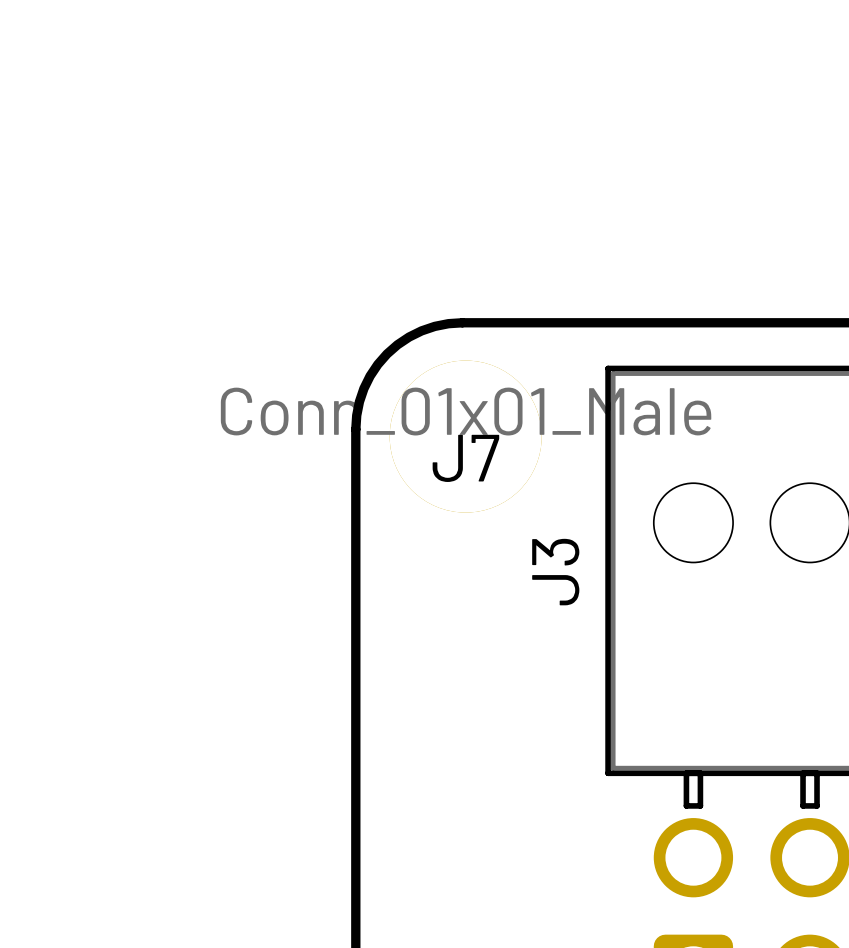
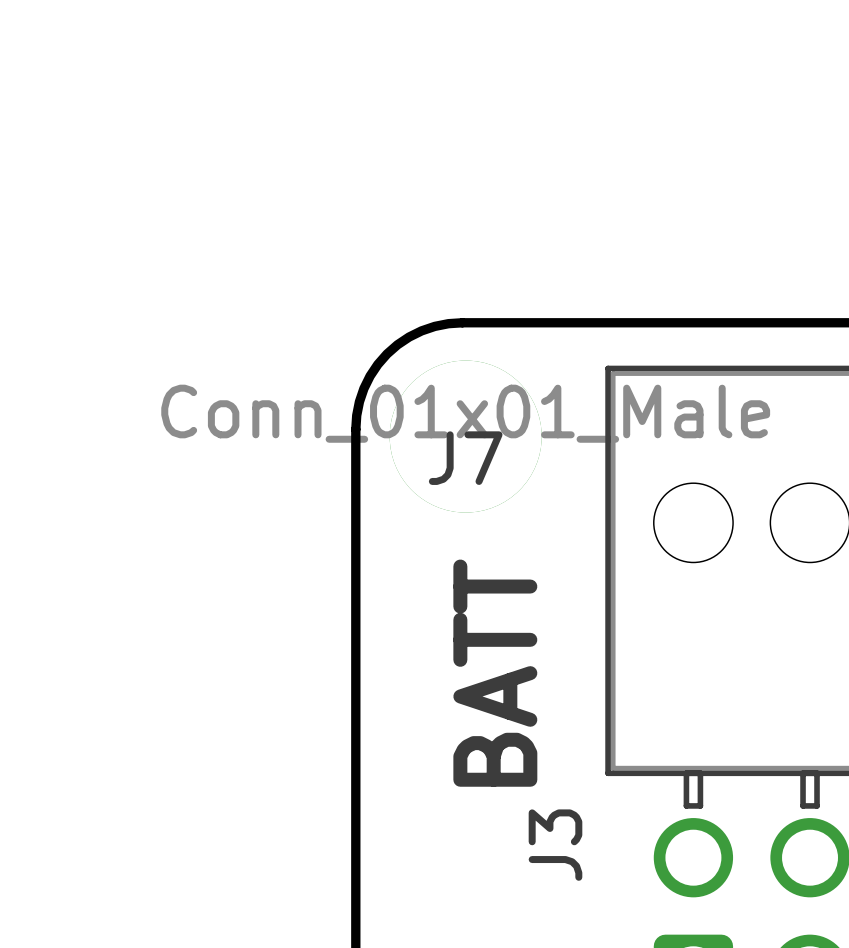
J3 name position: J3 (555, 572) -> J3 (555, 845)
text: none -> BATT (495, 673)

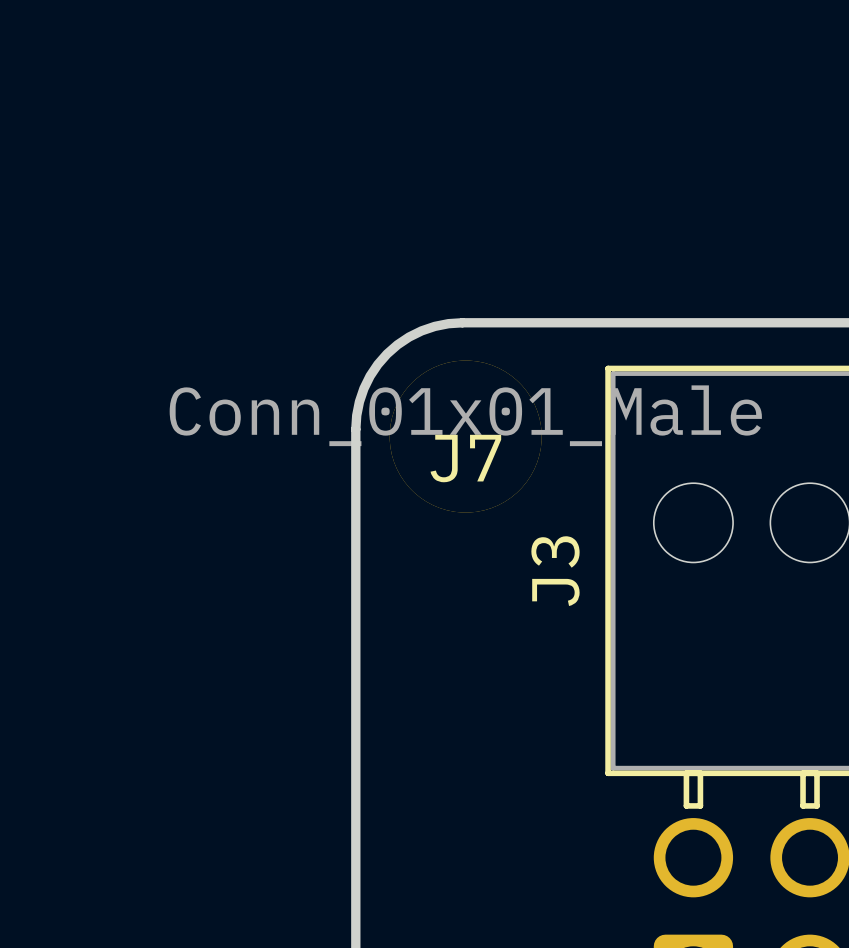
text: BATT (495, 673) -> none
J3 name position: J3 (555, 845) -> J3 (555, 571)

